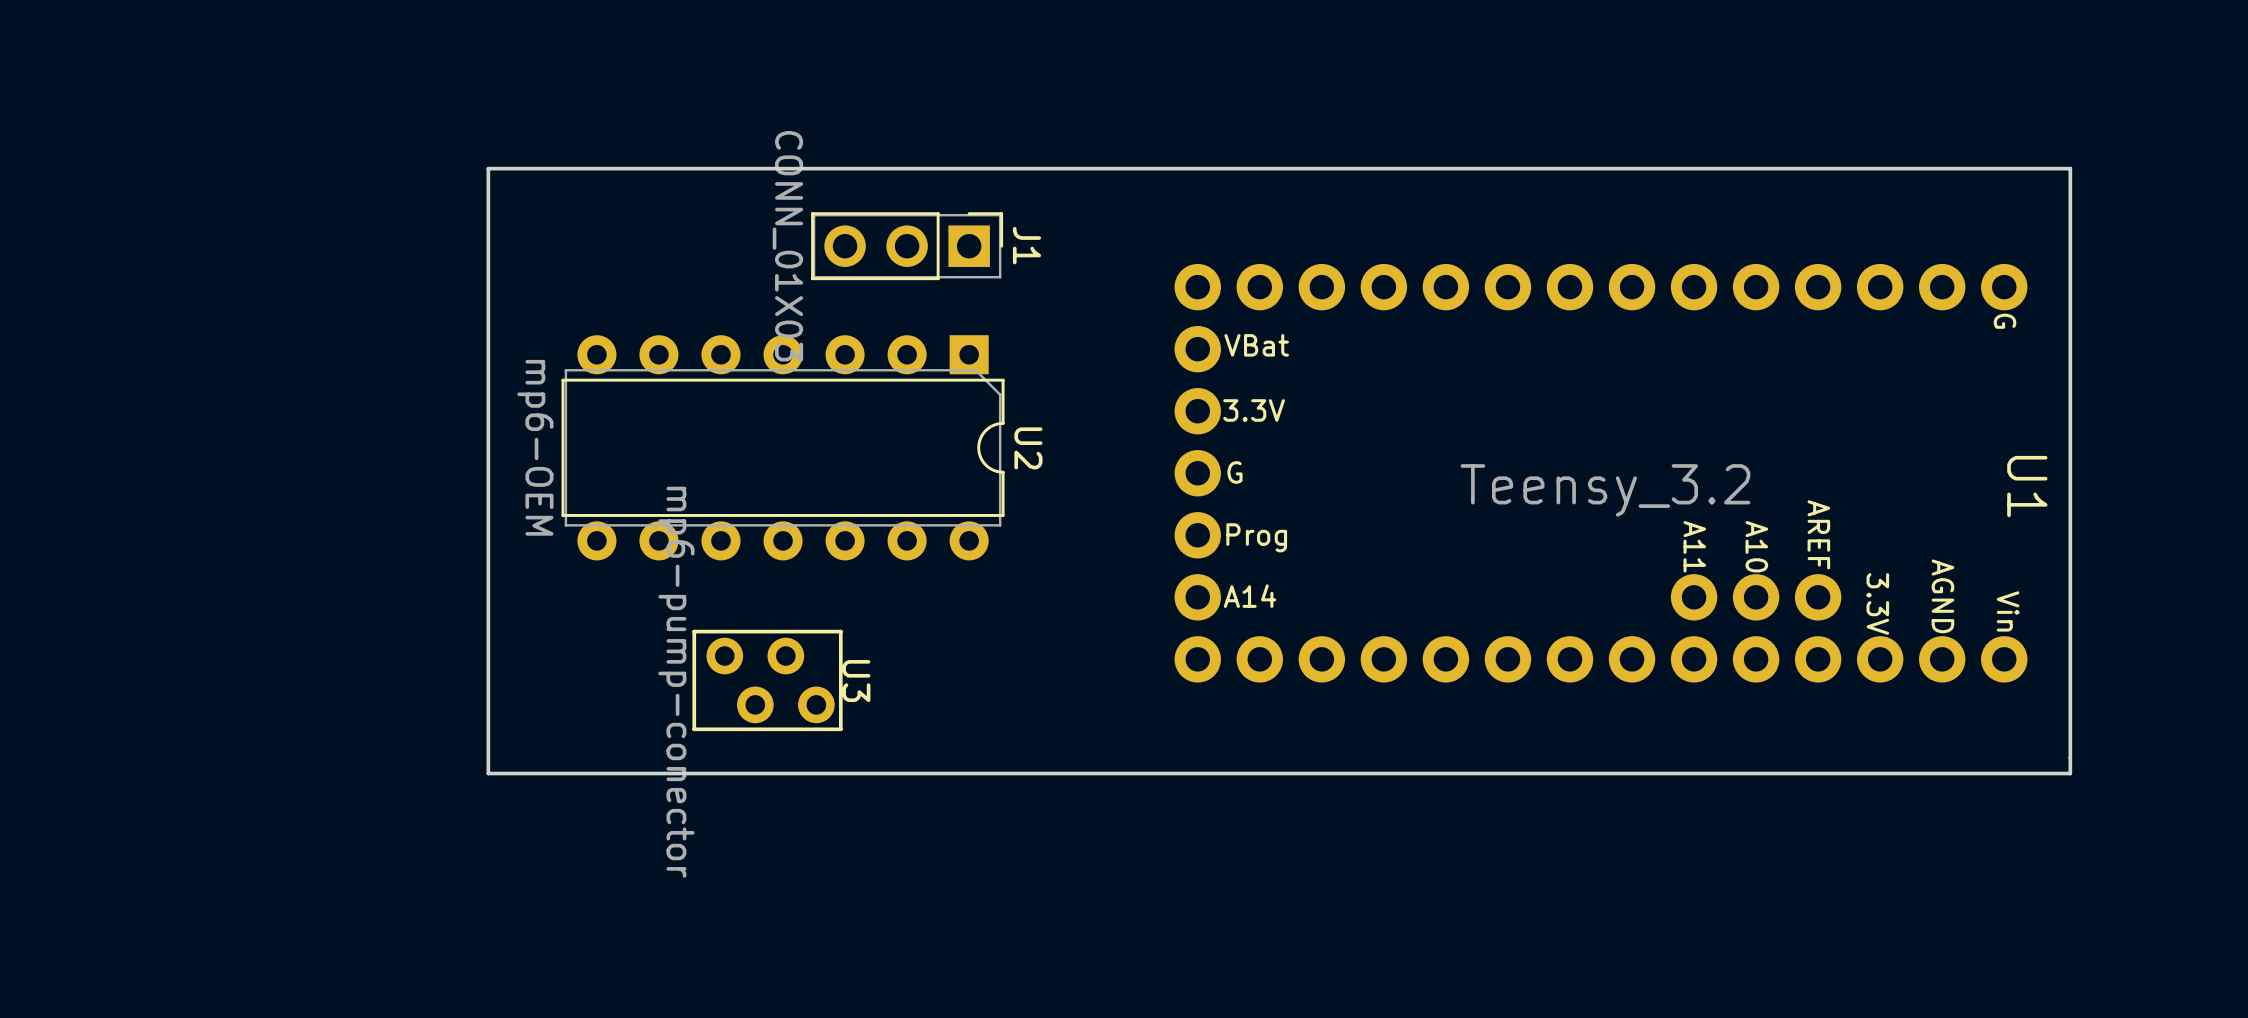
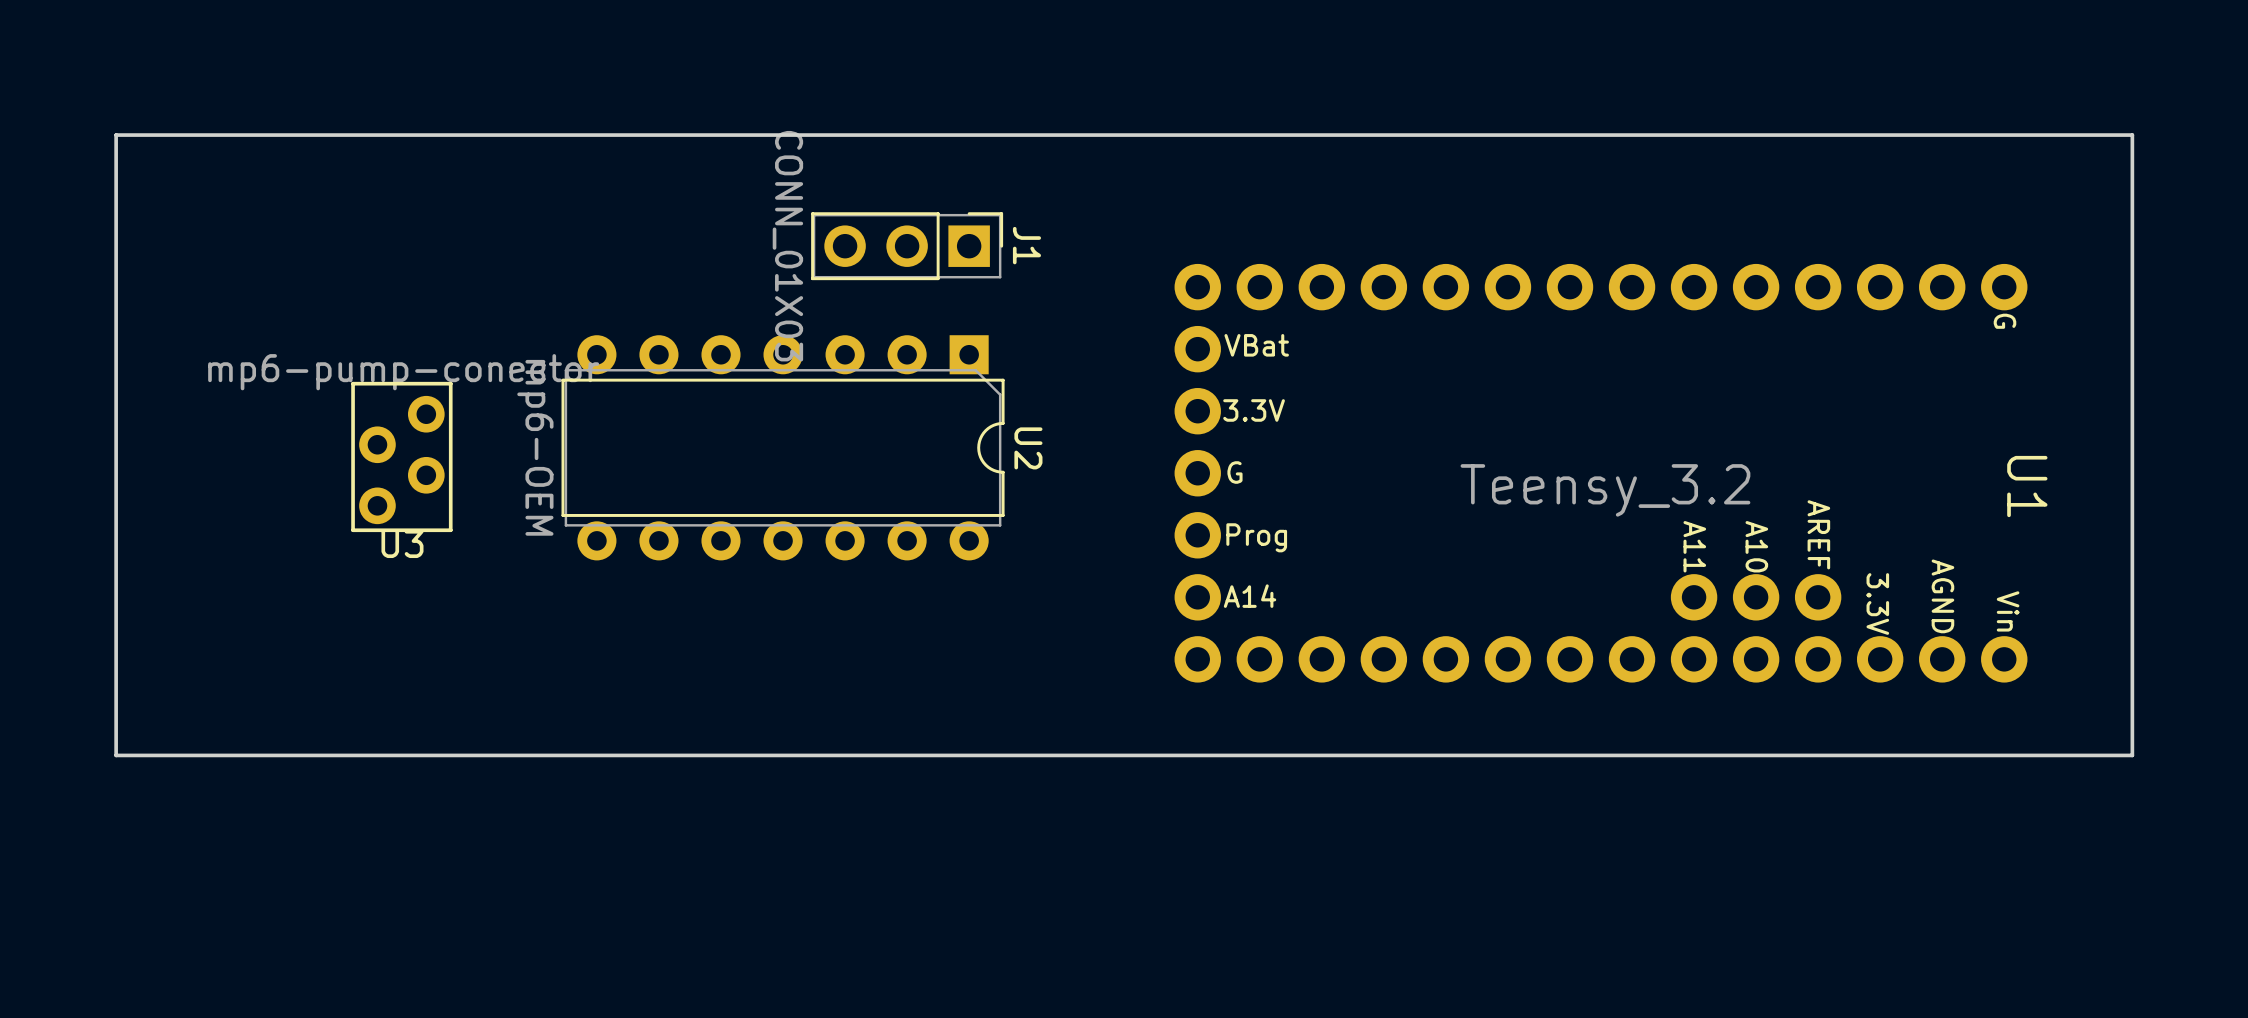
board edge: (2070, 168) (2070, 773) (488, 773) (488, 168) (2070, 168) -> (2132, 135) (2132, 755) (116, 755) (116, 135) (2132, 135)
U3 rotation: 0° (767, 680) -> 90° clockwise (401, 456)
U3 position: (767, 680) -> (401, 456)

